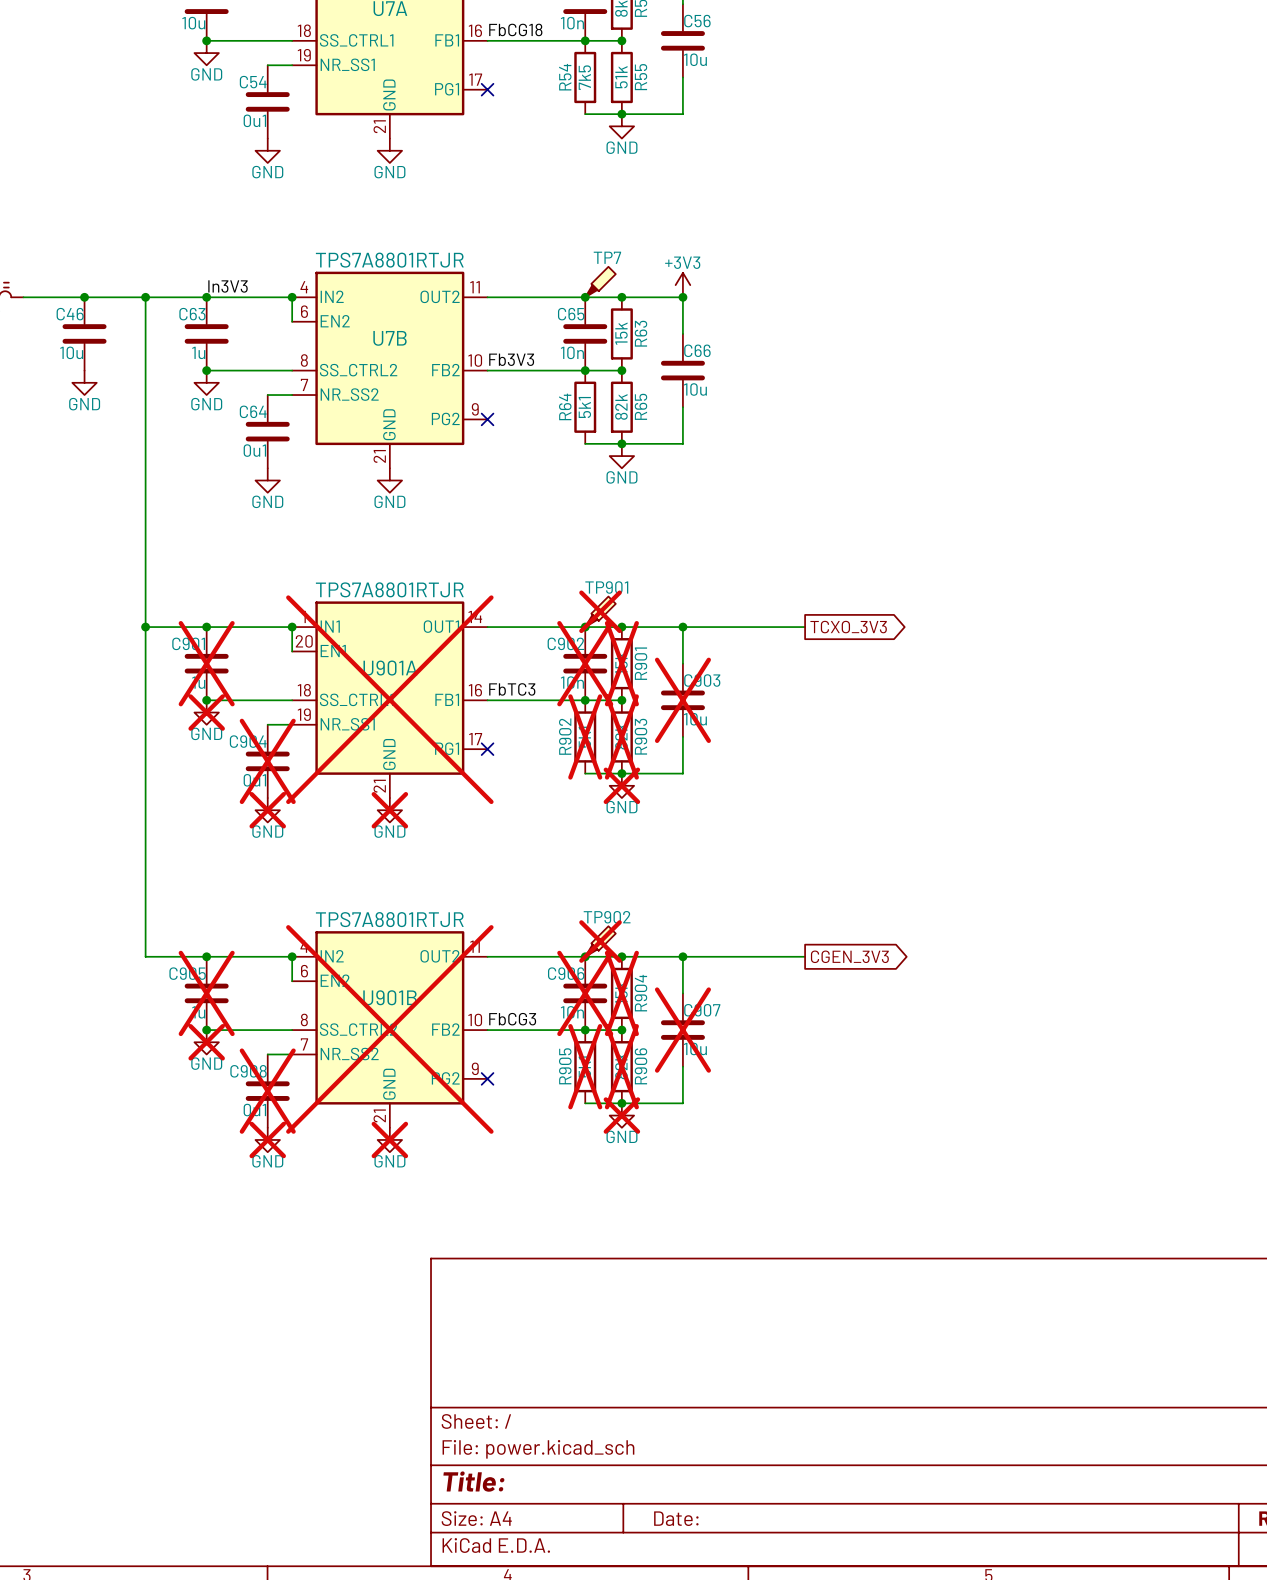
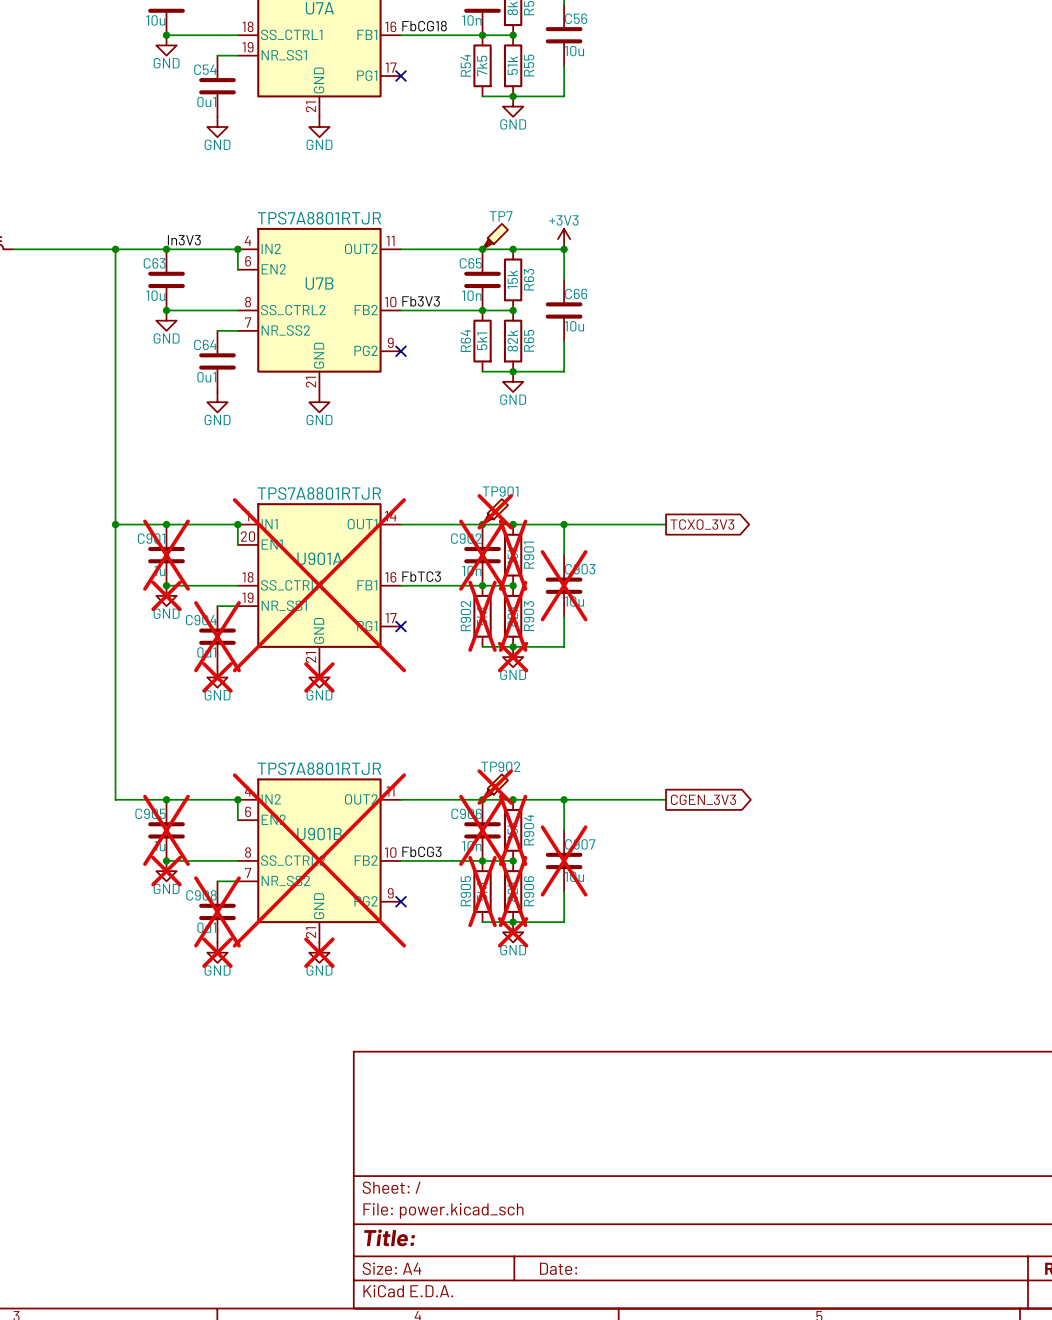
junction: (84, 297) -> none
C46: 10u (84, 333) -> none
C63 value: 1u (198, 352) -> 10u (155, 295)
power symbol: GND (84, 382) -> none

